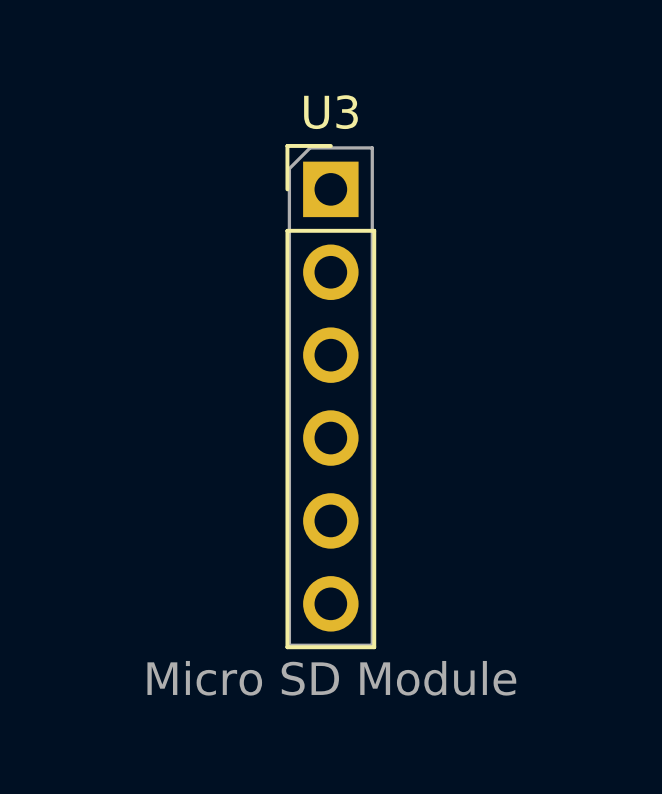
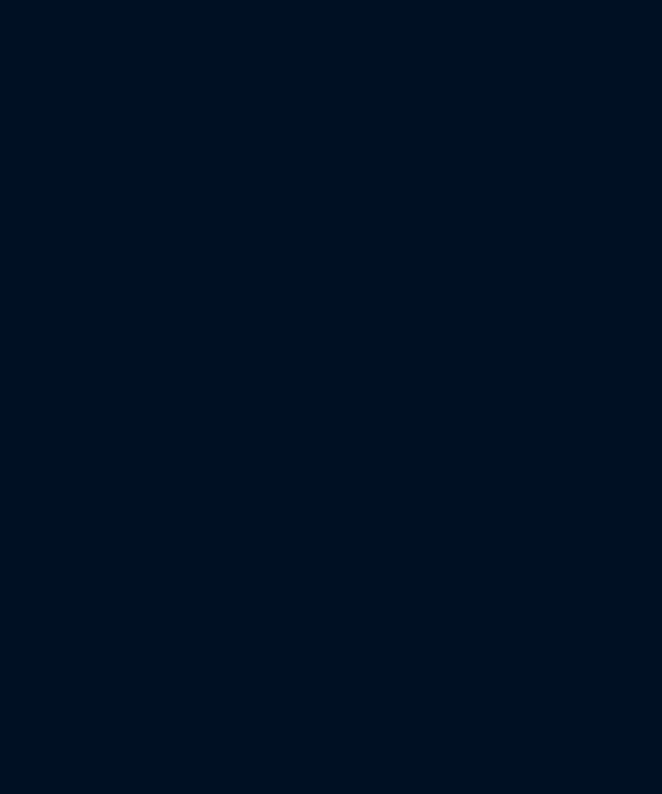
U3: Micro SD Module (330, 396) -> none

